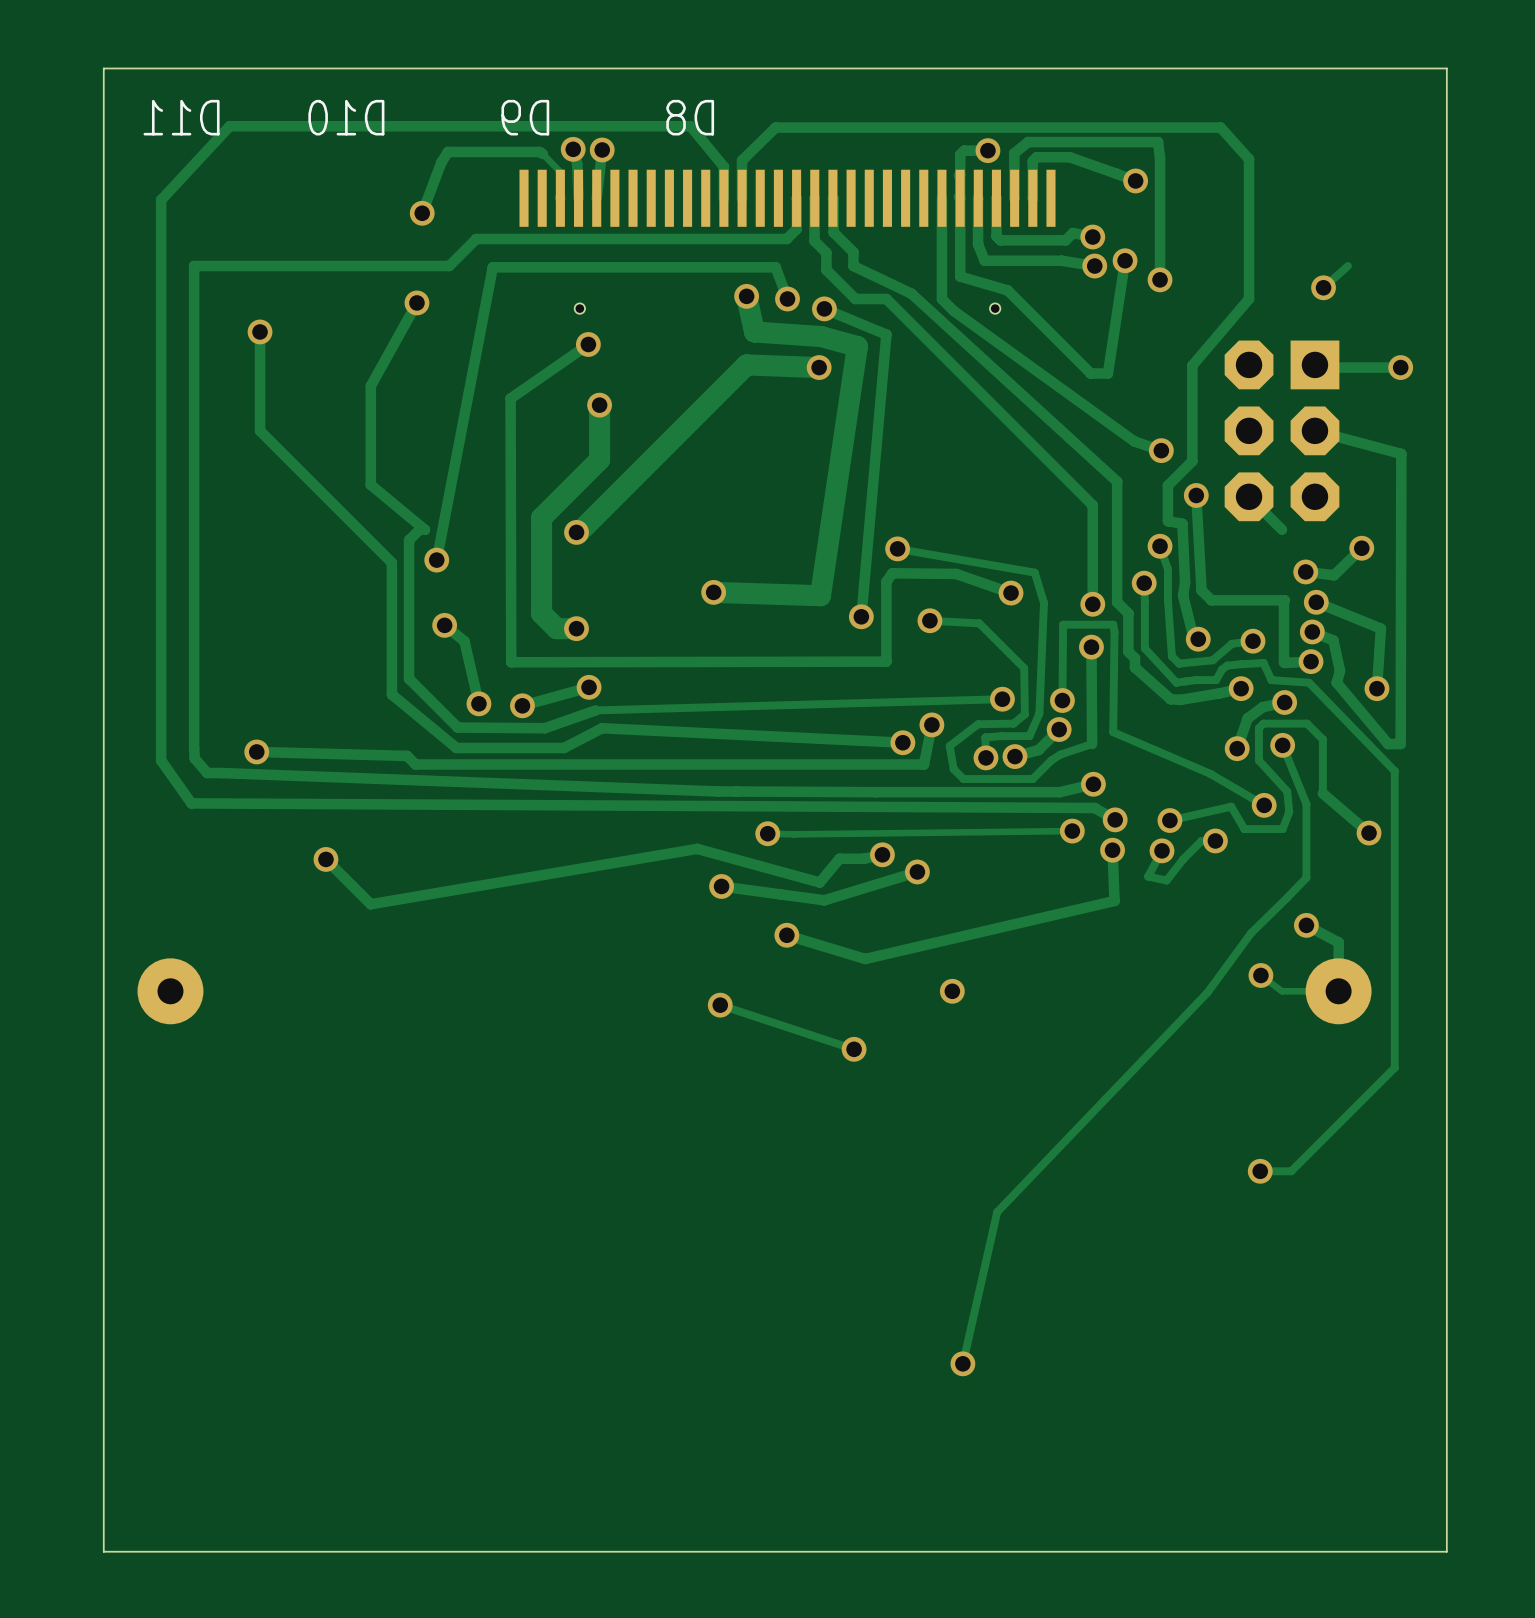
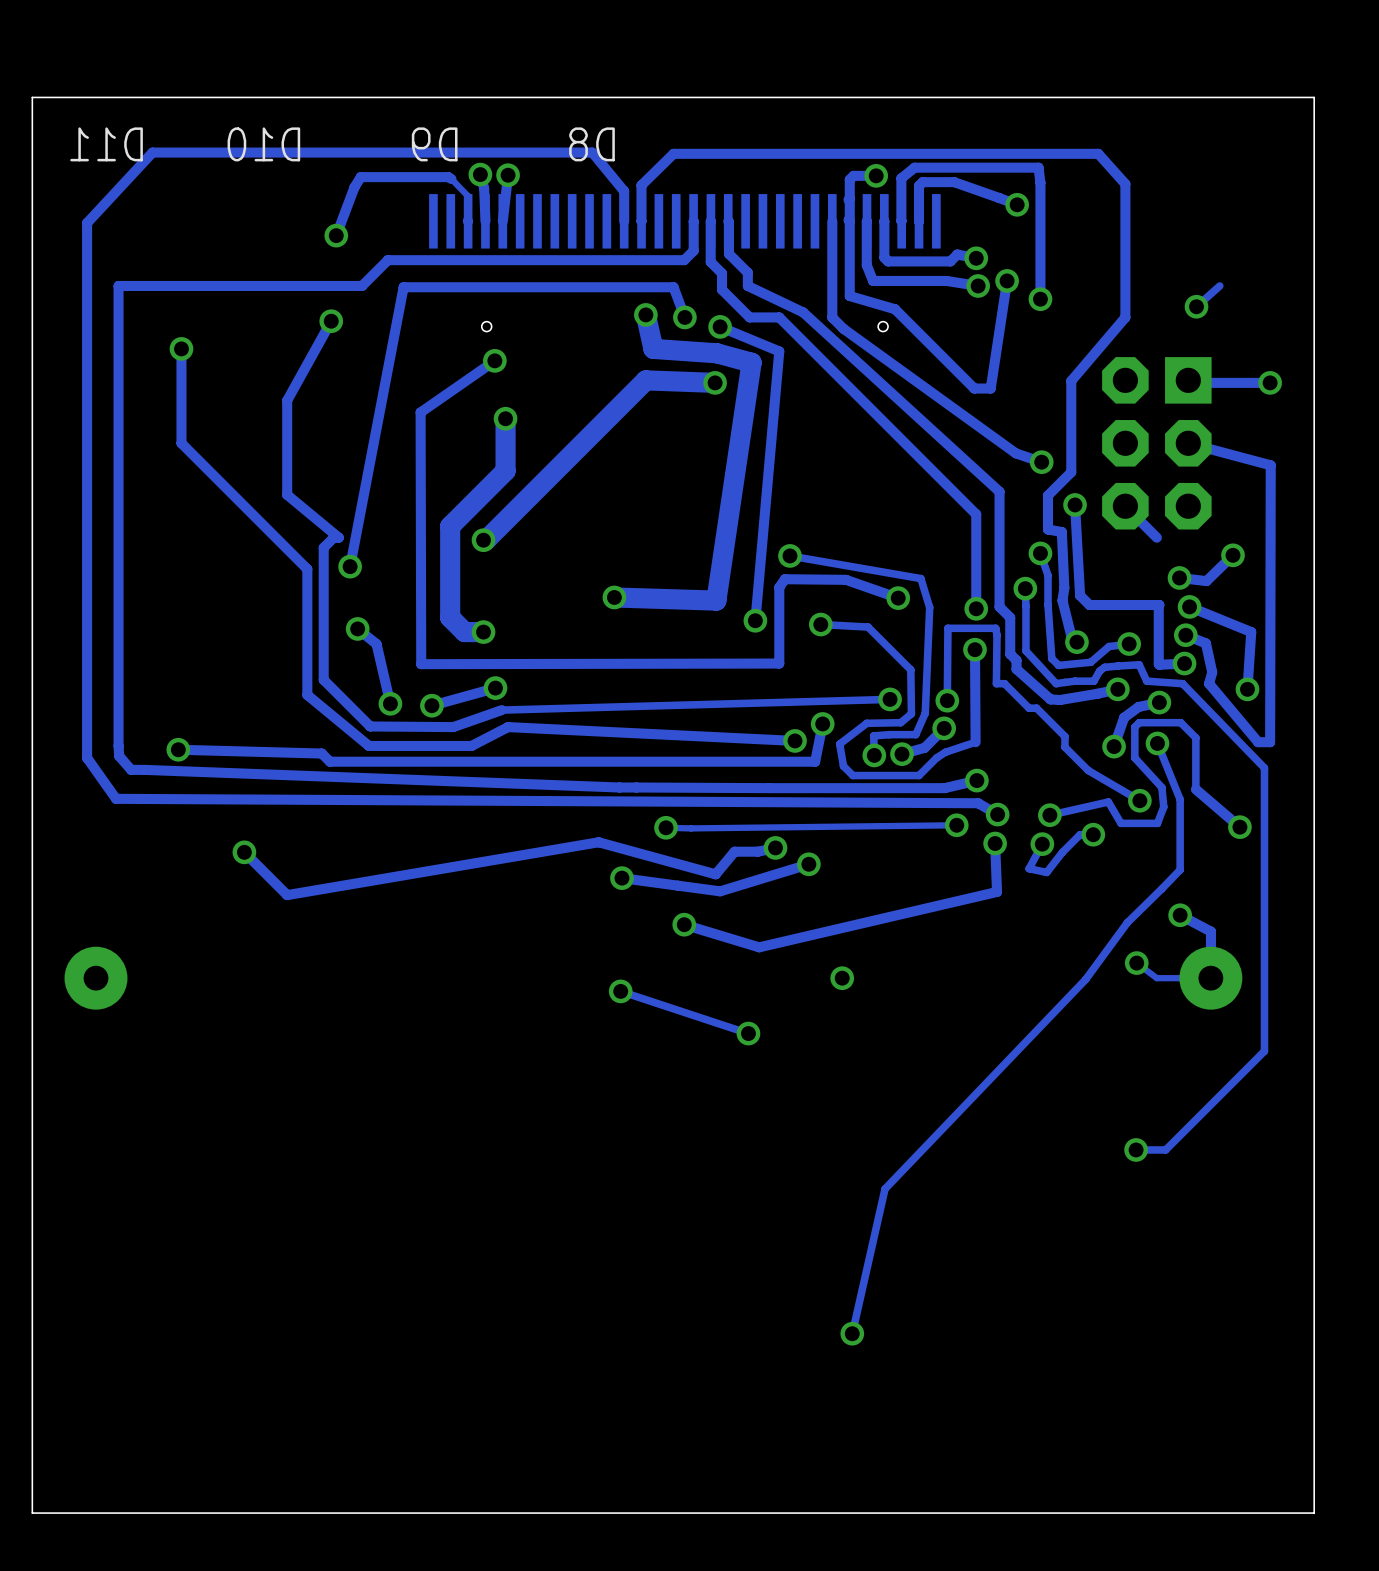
track: (1114, 631) (1113, 732) (1210, 773) -> (997, 635) (996, 683) (1004, 683) (1029, 708) (1036, 708) (1064, 736) (1064, 747) (1088, 770)

